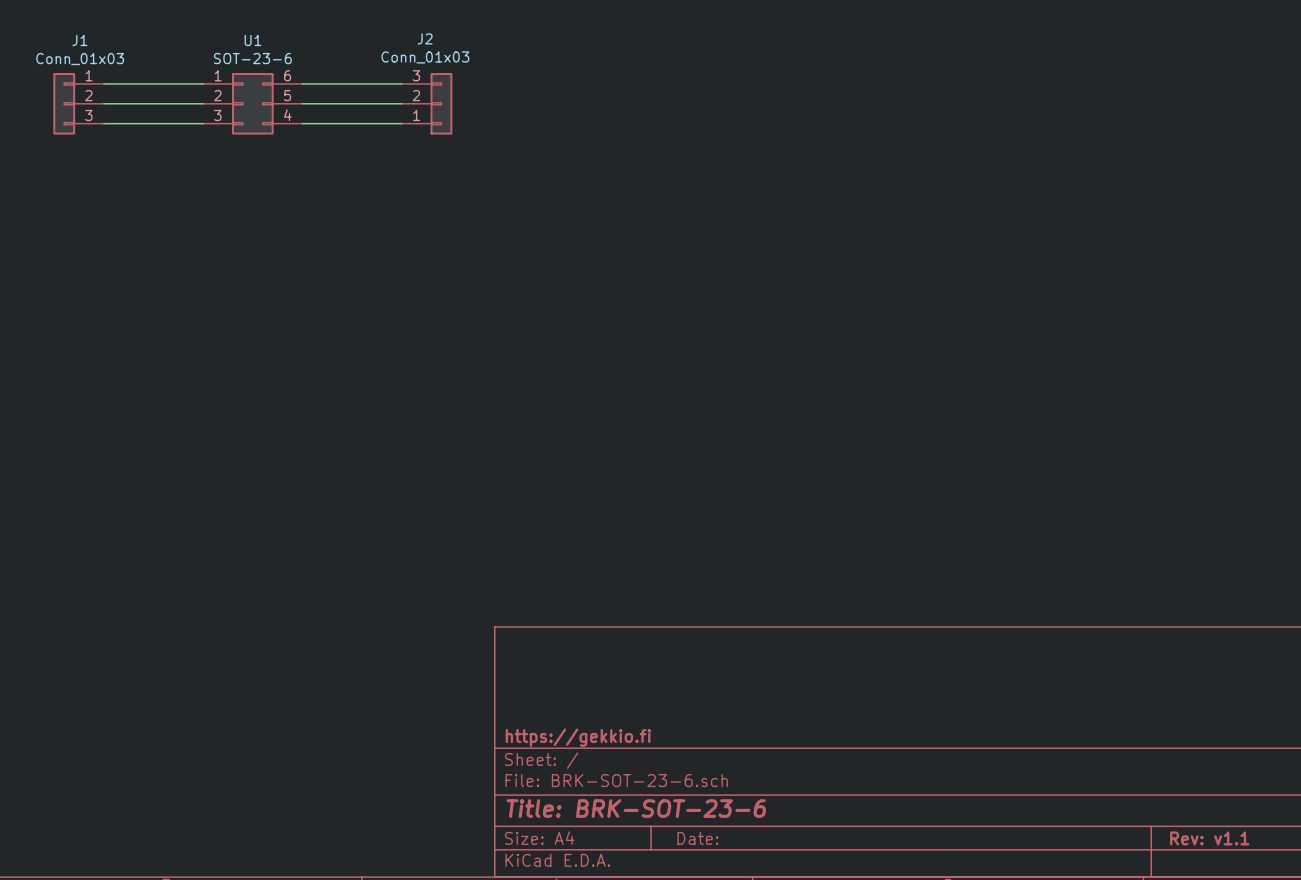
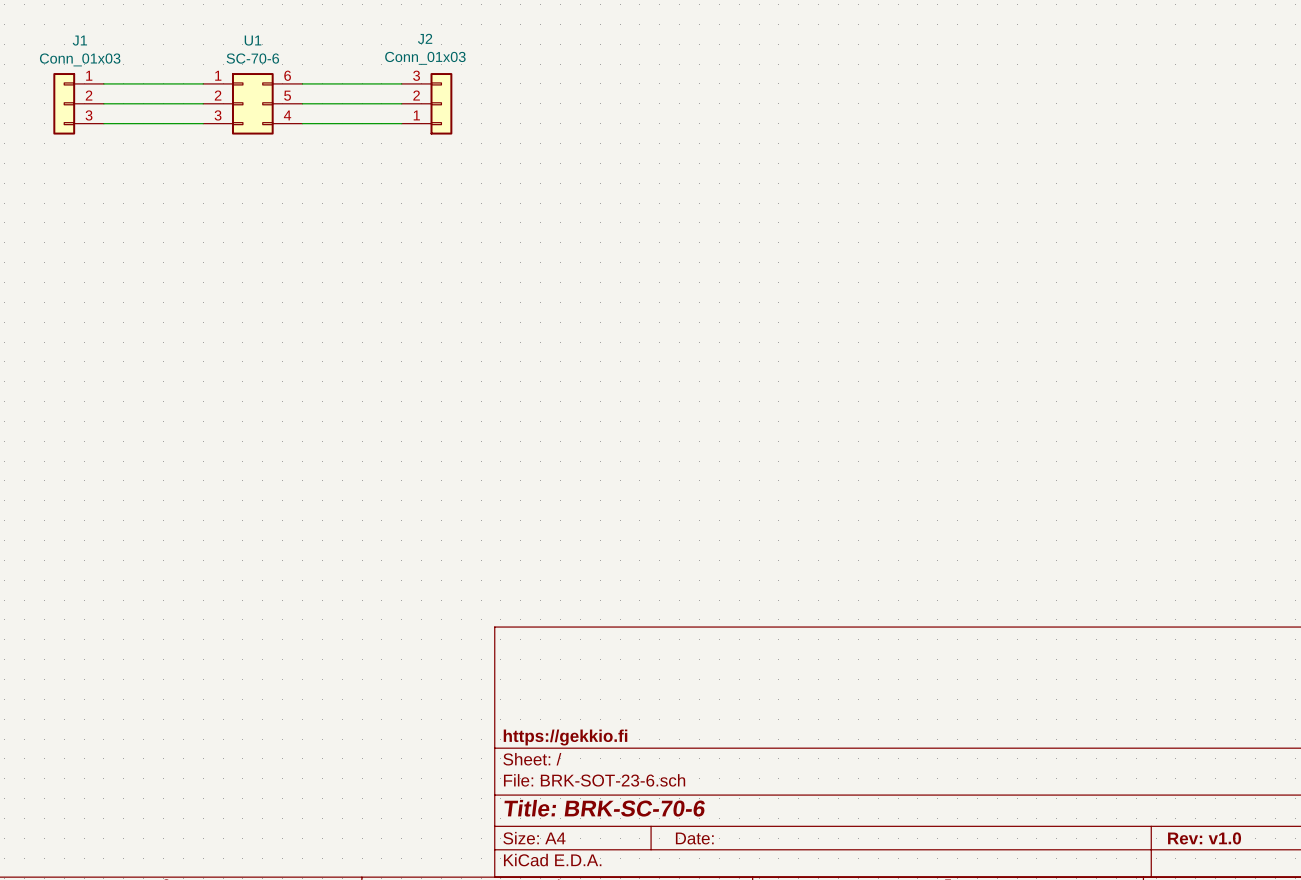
U1 value: SOT-23-6 (252, 58) -> SC-70-6 (252, 58)
title block: Title: BRK-SOT-23-6 (636, 808) -> Title: BRK-SC-70-6 (604, 808)
title block: Rev: v1.1 (1209, 838) -> Rev: v1.0 (1204, 838)

